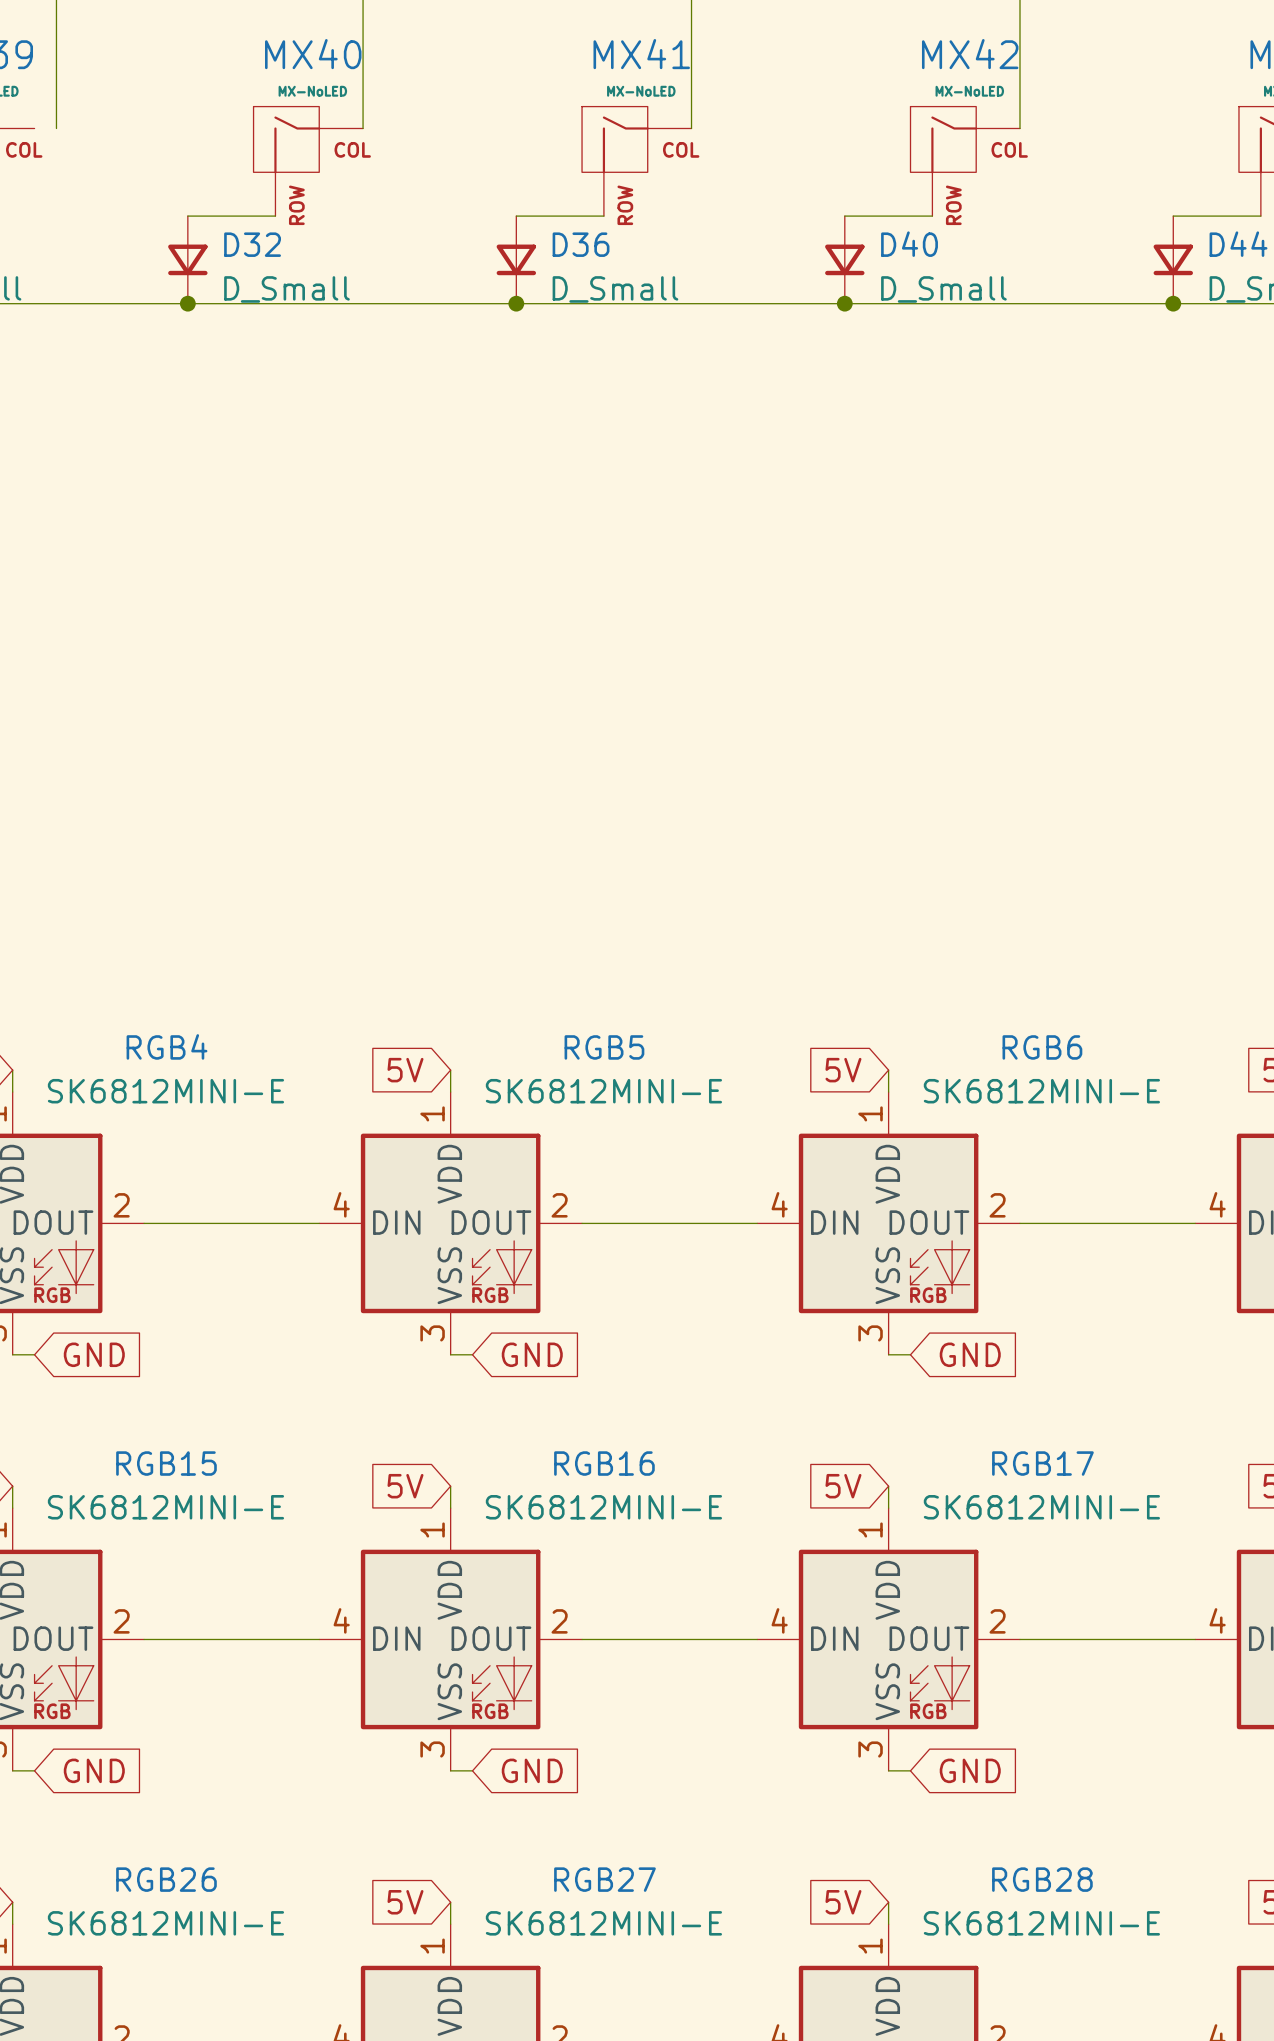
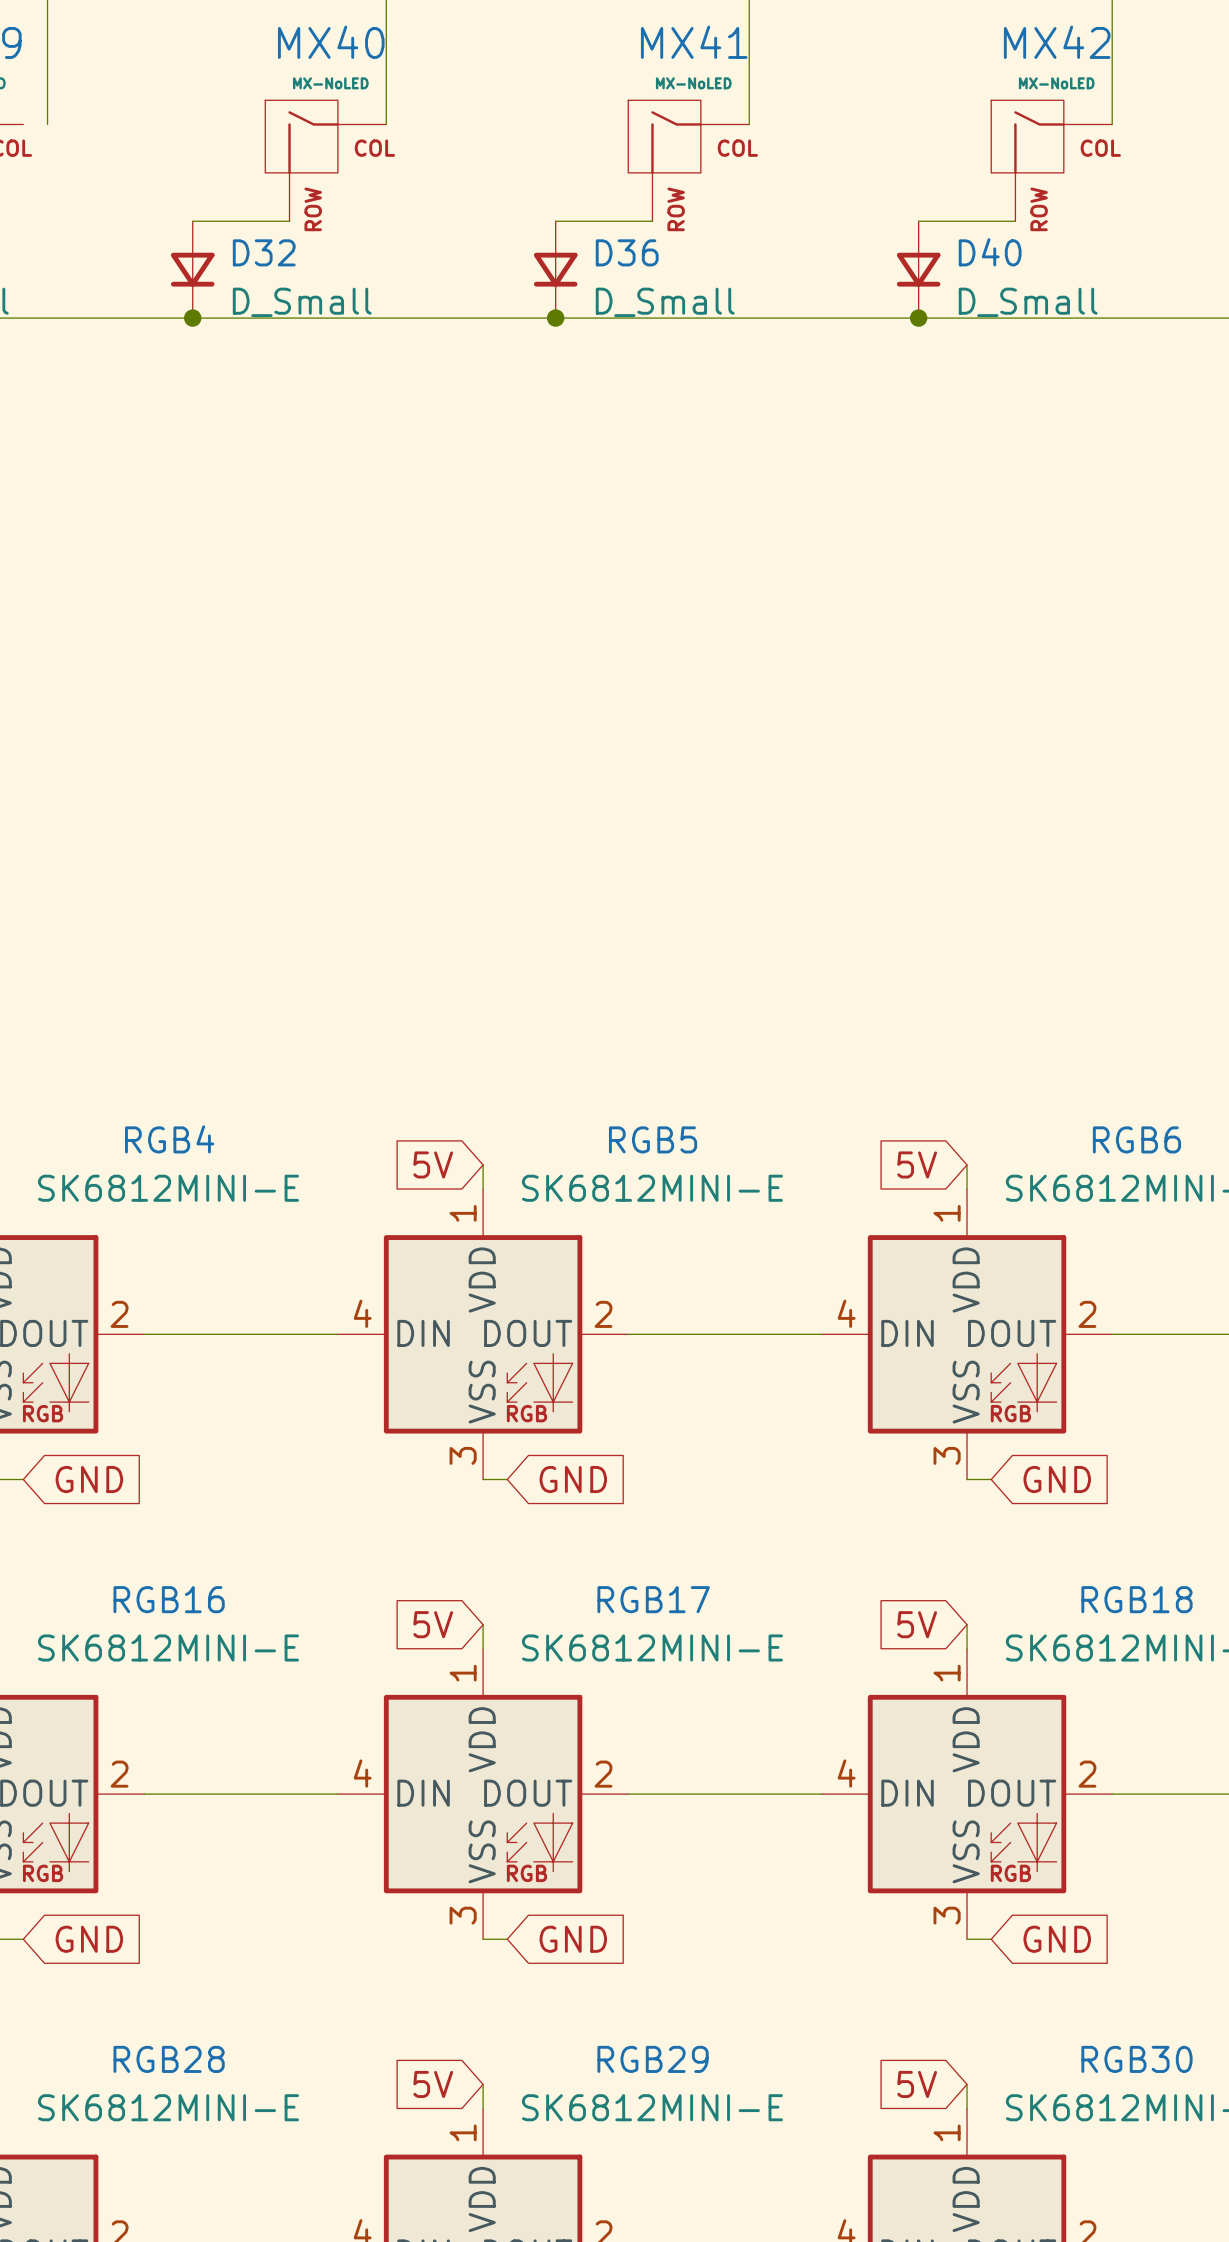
RGB15 name: RGB15 (166, 1463) -> RGB16 (169, 1599)
RGB16 name: RGB16 (604, 1463) -> RGB17 (653, 1599)
RGB17 name: RGB17 (1042, 1463) -> RGB18 (1136, 1599)
RGB26 name: RGB26 (166, 1879) -> RGB28 (169, 2059)
RGB27 name: RGB27 (604, 1879) -> RGB29 (653, 2059)
RGB28 name: RGB28 (1042, 1879) -> RGB30 (1136, 2059)

